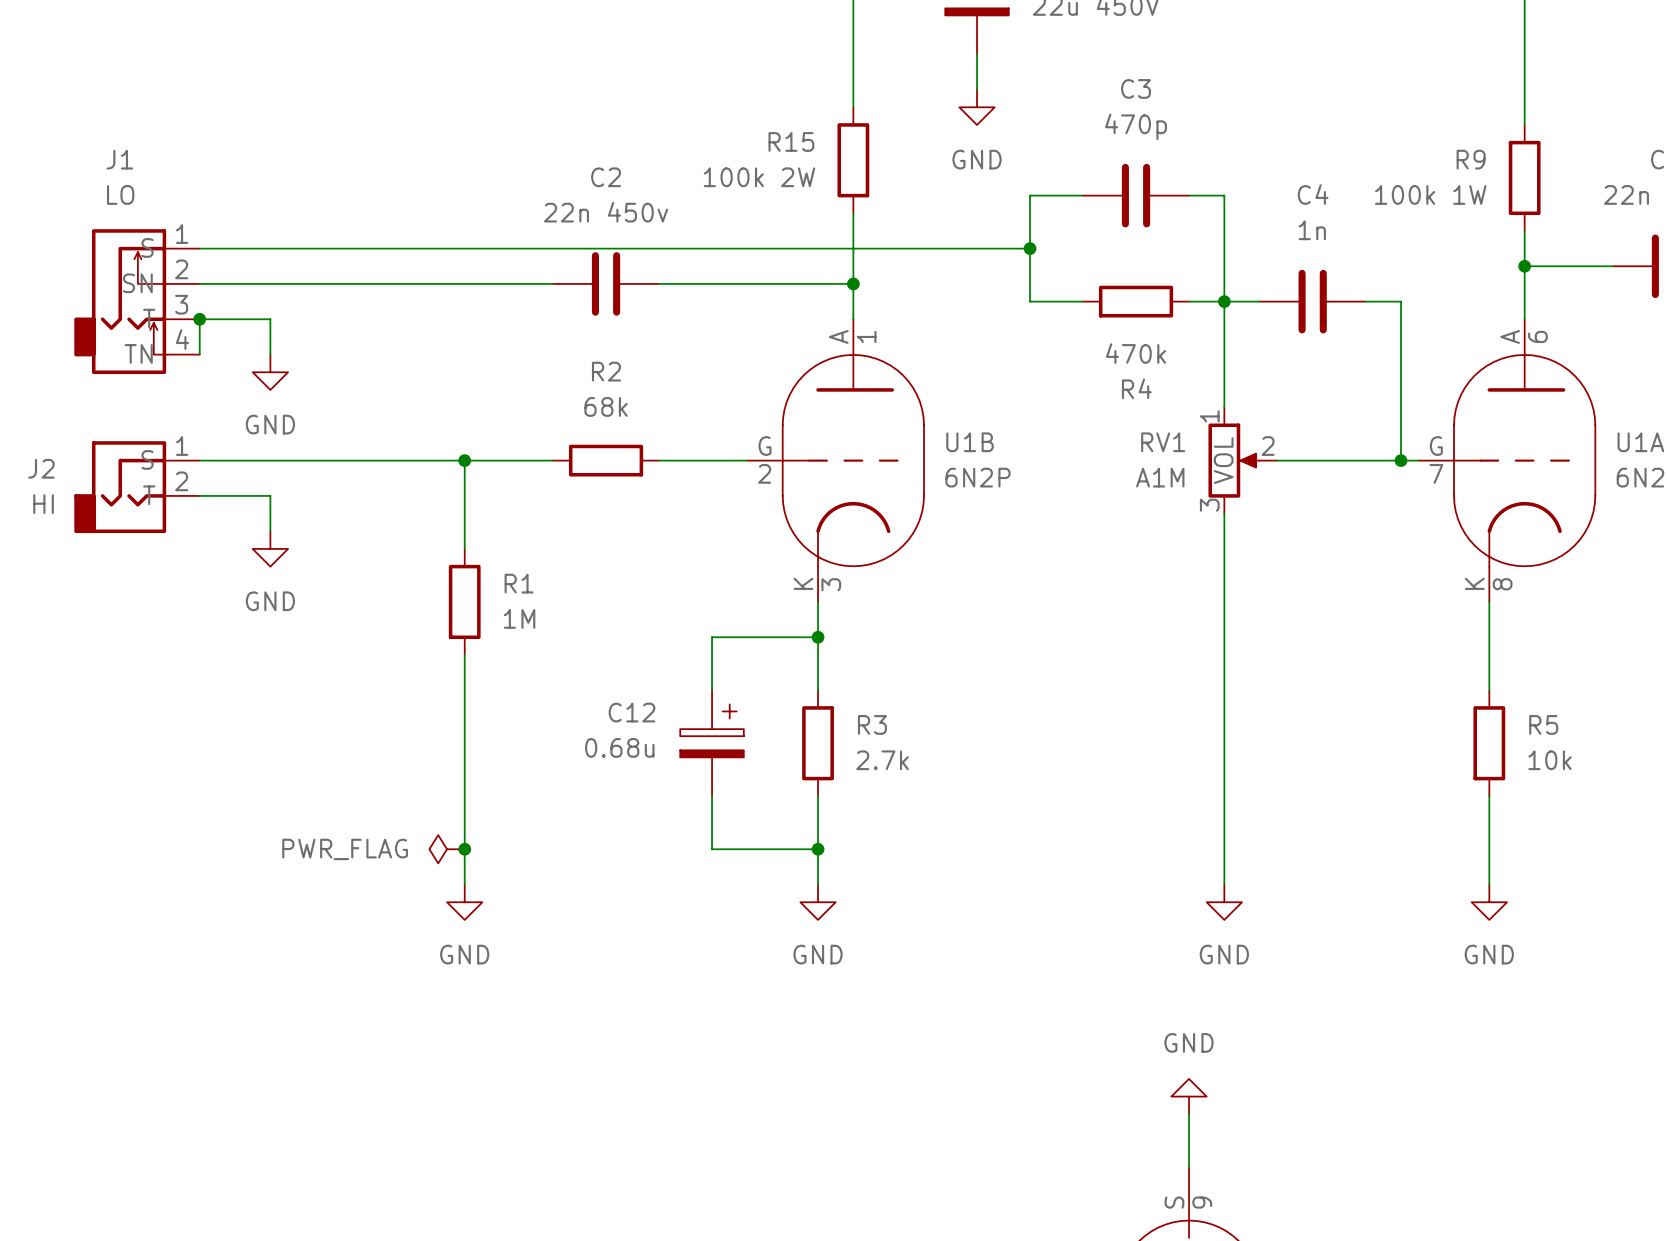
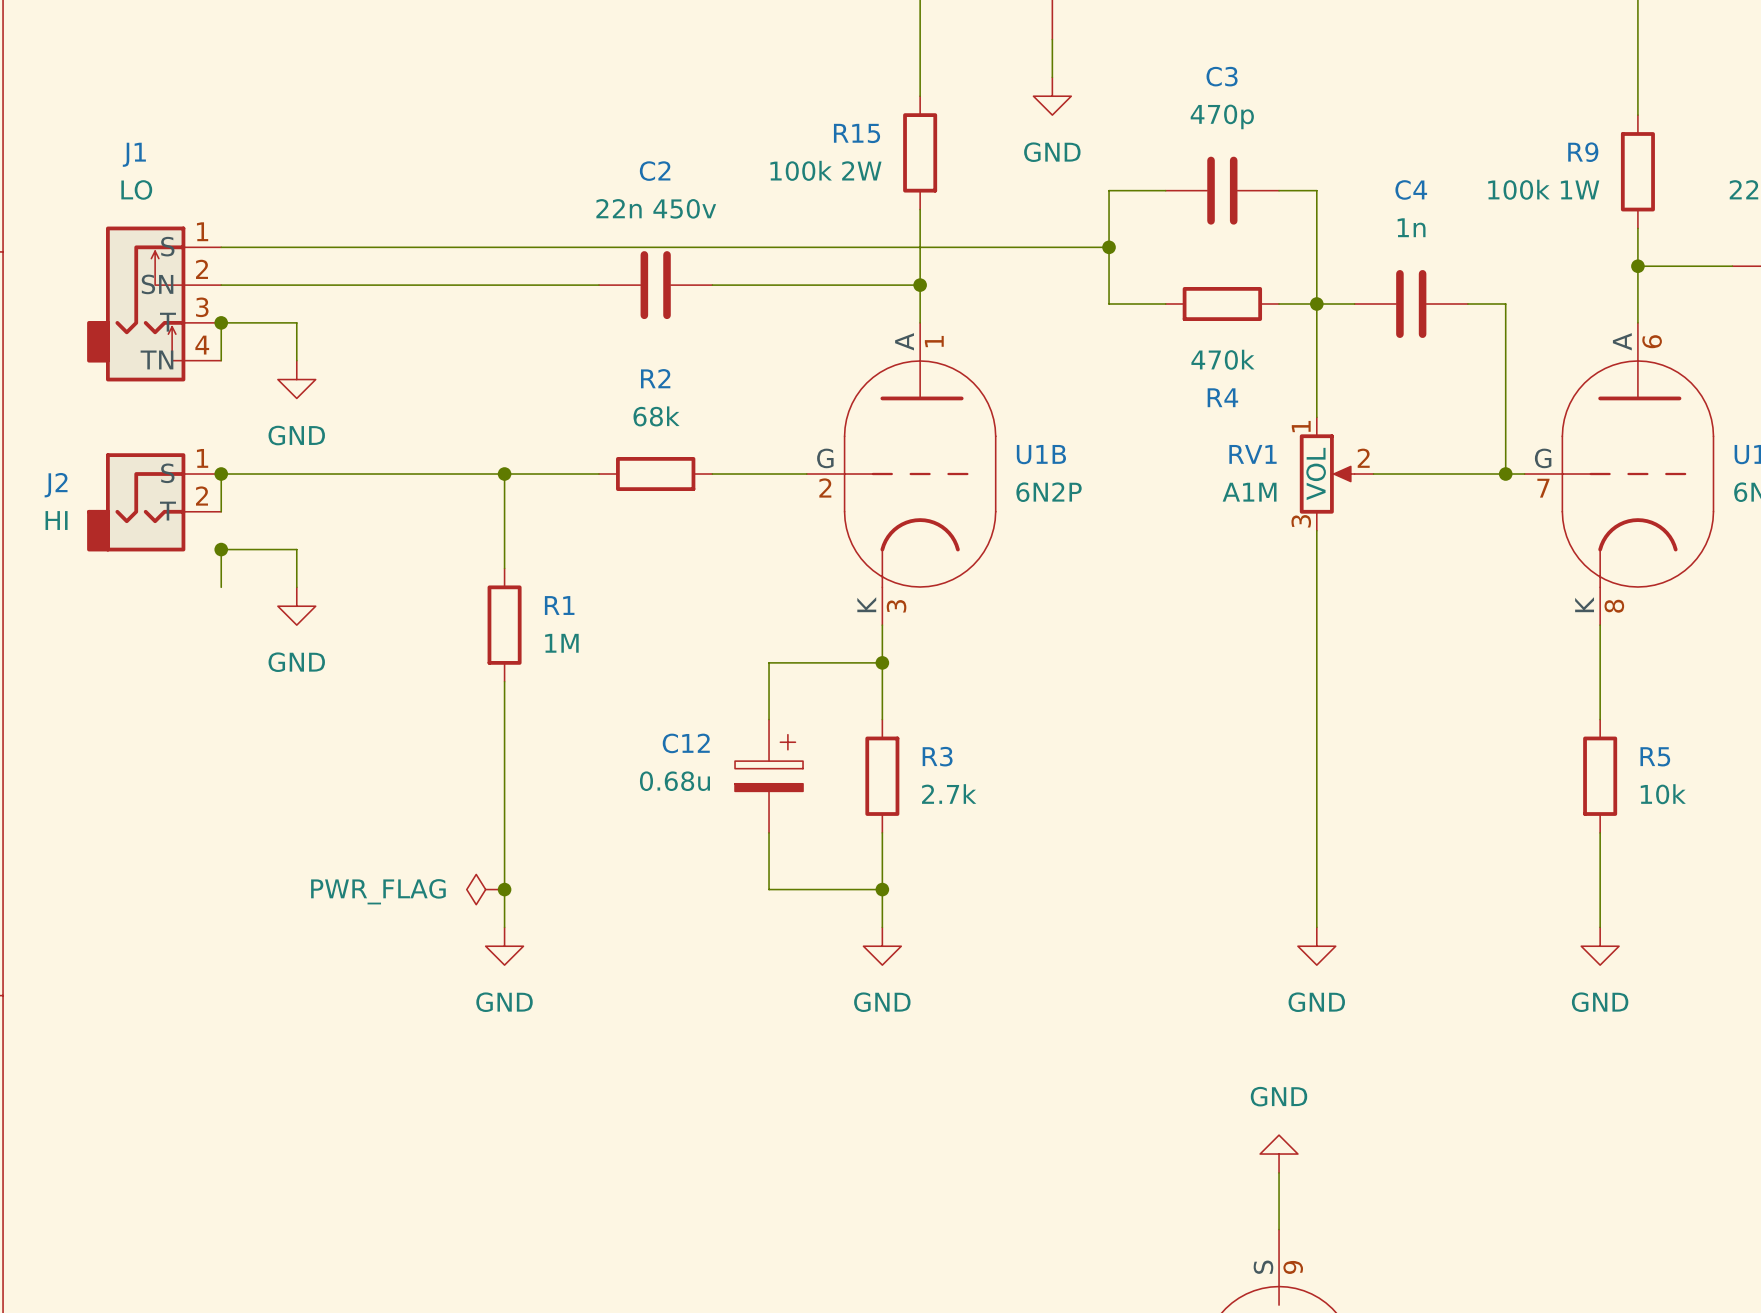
junction: none -> (221, 474)
wire: (199, 495) (270, 495) (270, 531) -> (221, 511) (221, 474)
junction: none -> (221, 549)
power symbol position: GND (270, 548) -> GND (296, 606)
wire: none -> (221, 587) (221, 549) (296, 549) (296, 587)

